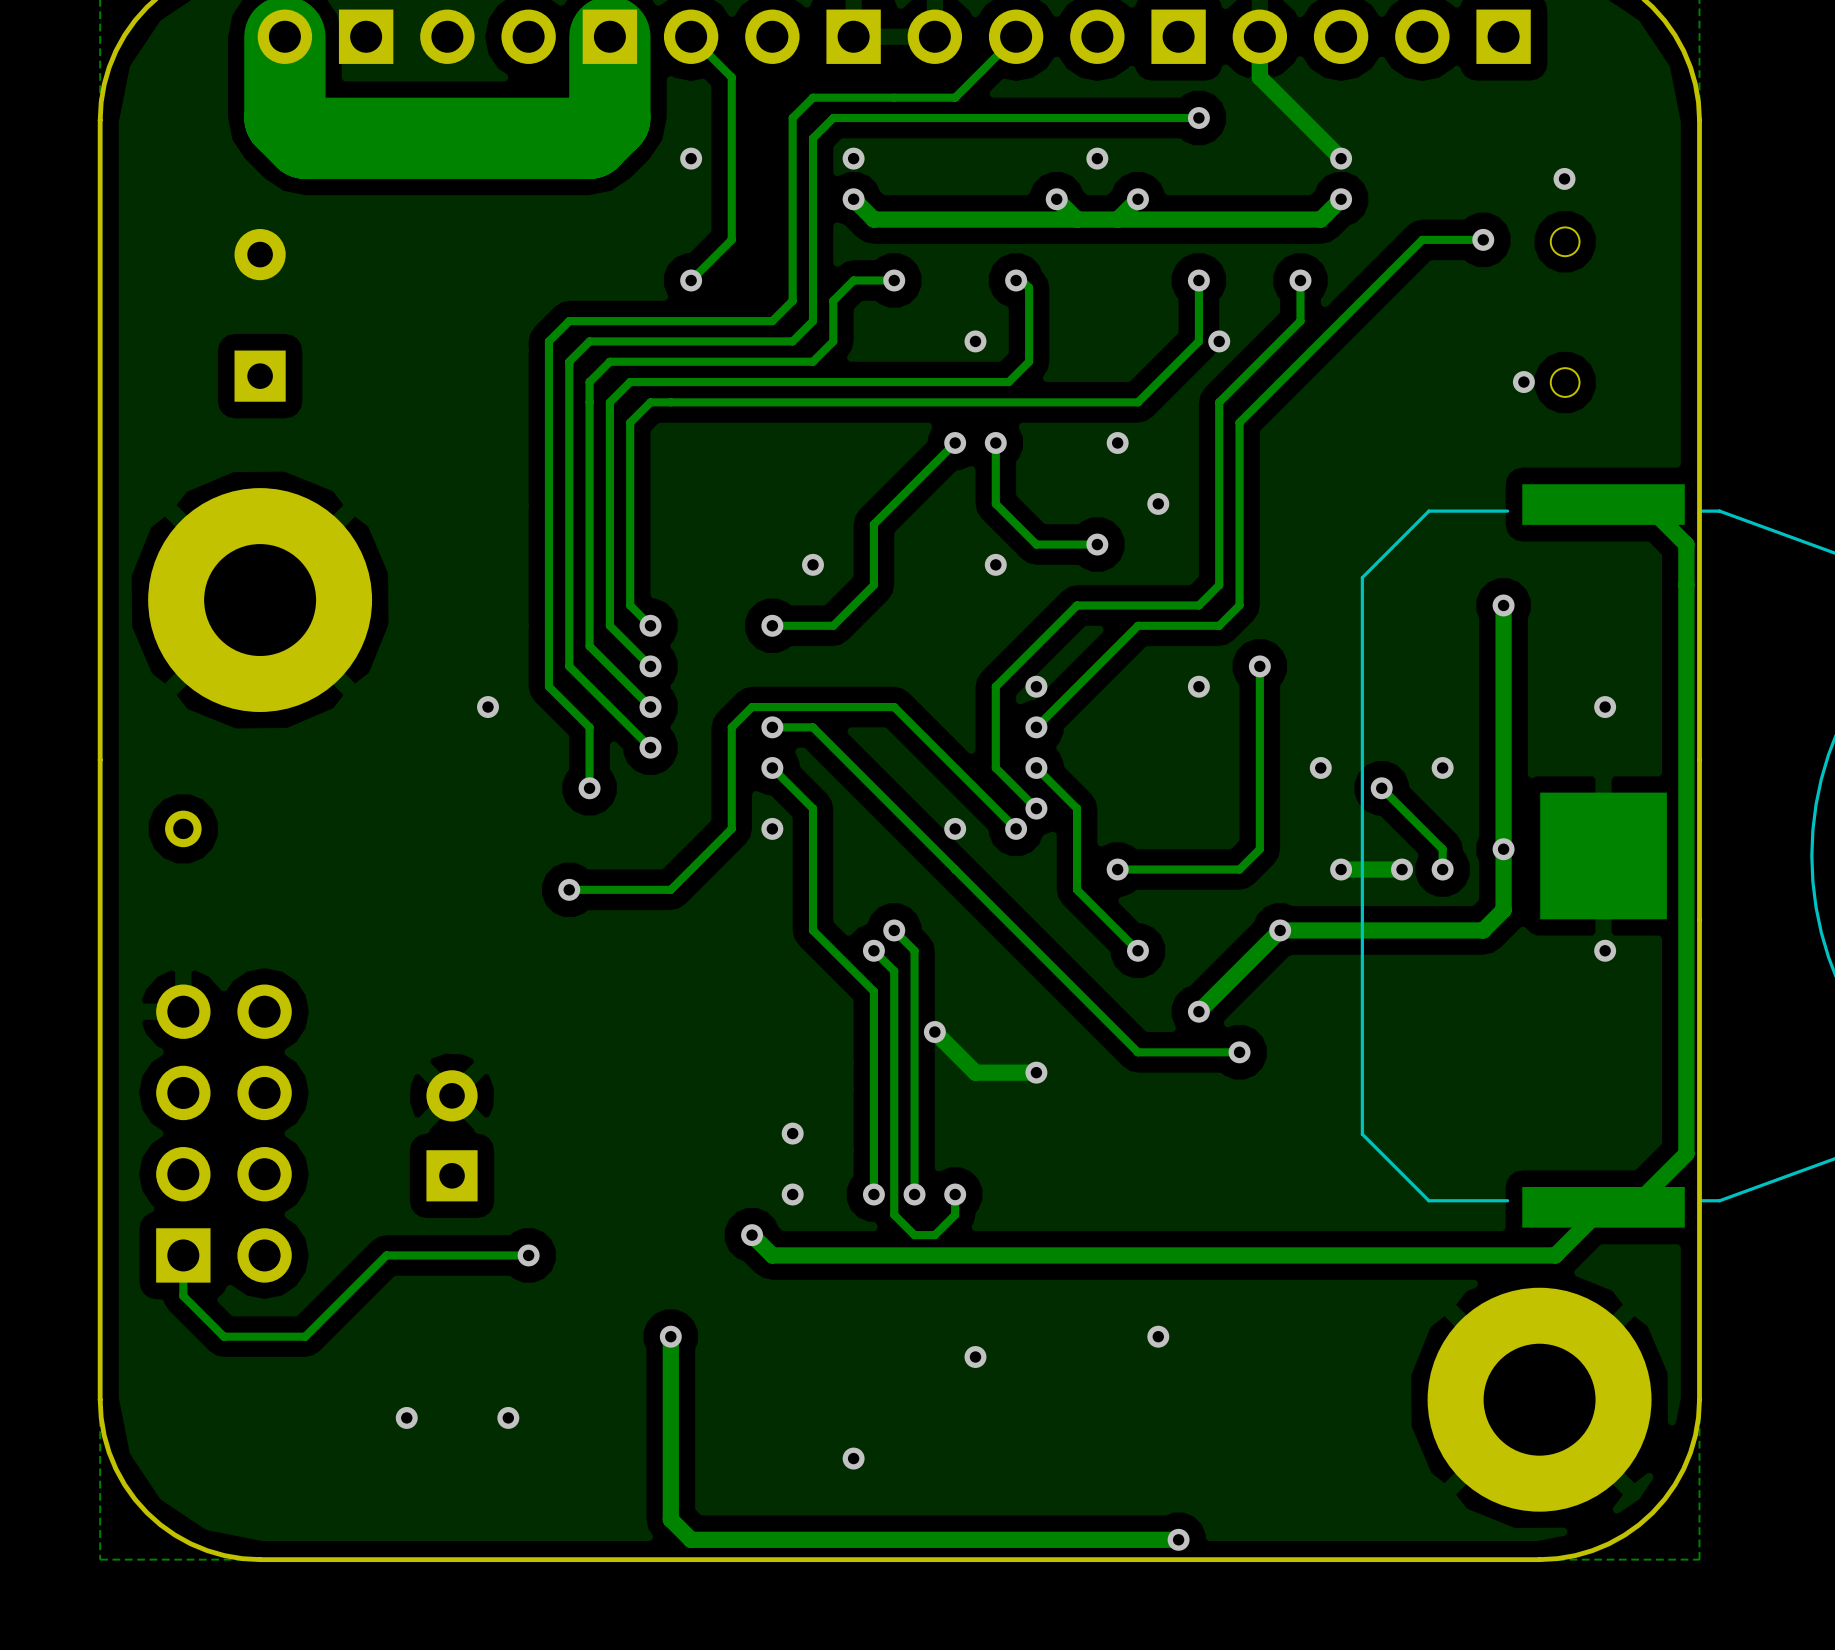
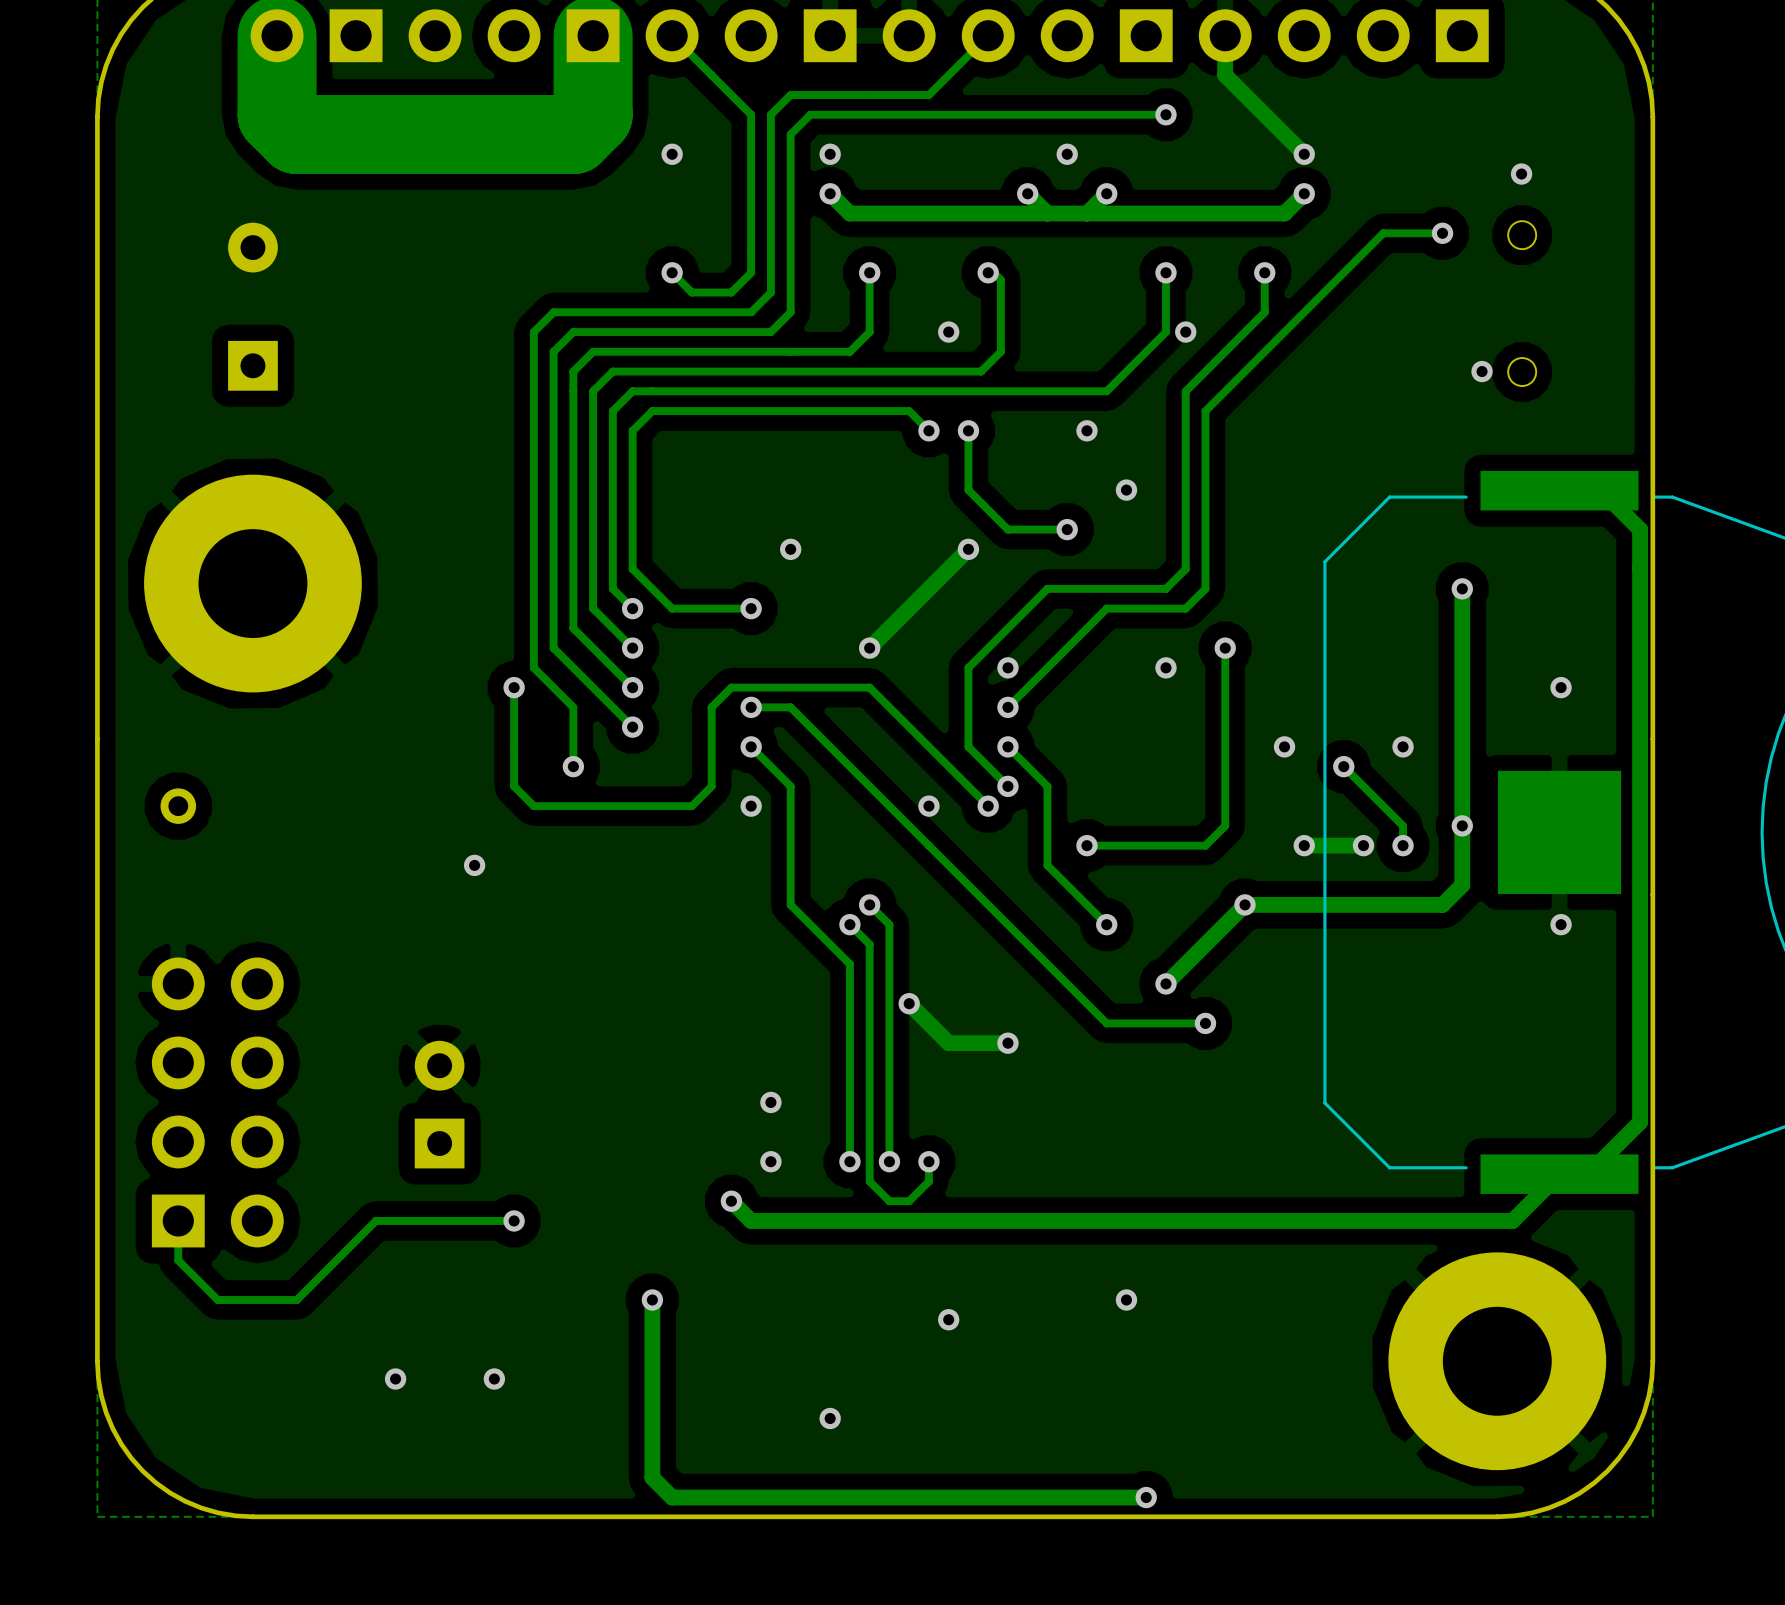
track: (731, 77) (731, 239) (691, 280) -> (711, 75) (751, 114) (751, 272) (731, 292) (691, 292) (672, 272)
track: (894, 280) (853, 280) (833, 300) (833, 341) (812, 361) -> (869, 272) (869, 332) (849, 351) (790, 351)
track: (955, 442) (873, 524) (873, 585) (833, 625) (772, 625) -> (928, 430) (909, 411) (652, 411) (632, 430) (632, 569) (672, 608) (751, 608)
track: none -> (968, 549) (869, 648)
via: none -> (869, 648)
via position: (488, 707) -> (514, 687)
track: (731, 808) (731, 828) (670, 889) (569, 889) -> (711, 786) (691, 806) (533, 806) (514, 786) (514, 687)
via position: (569, 889) -> (474, 865)

